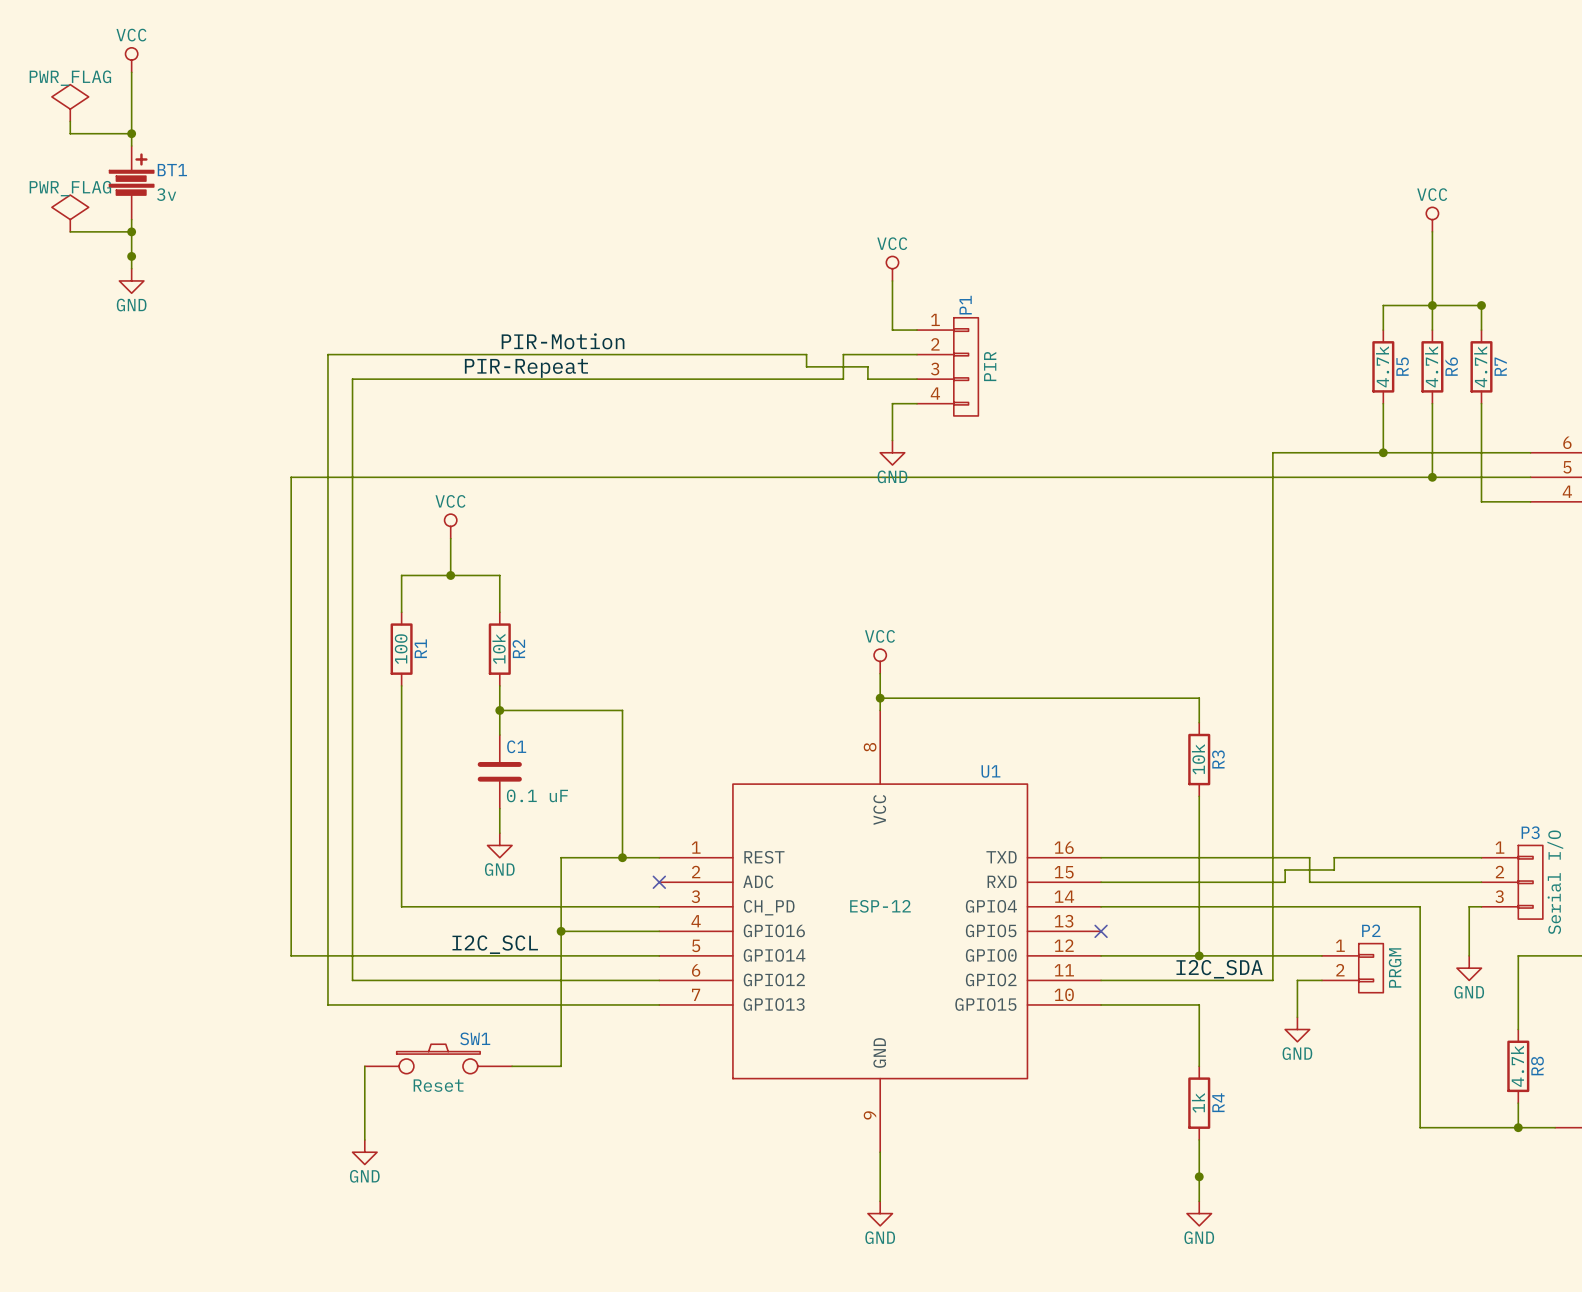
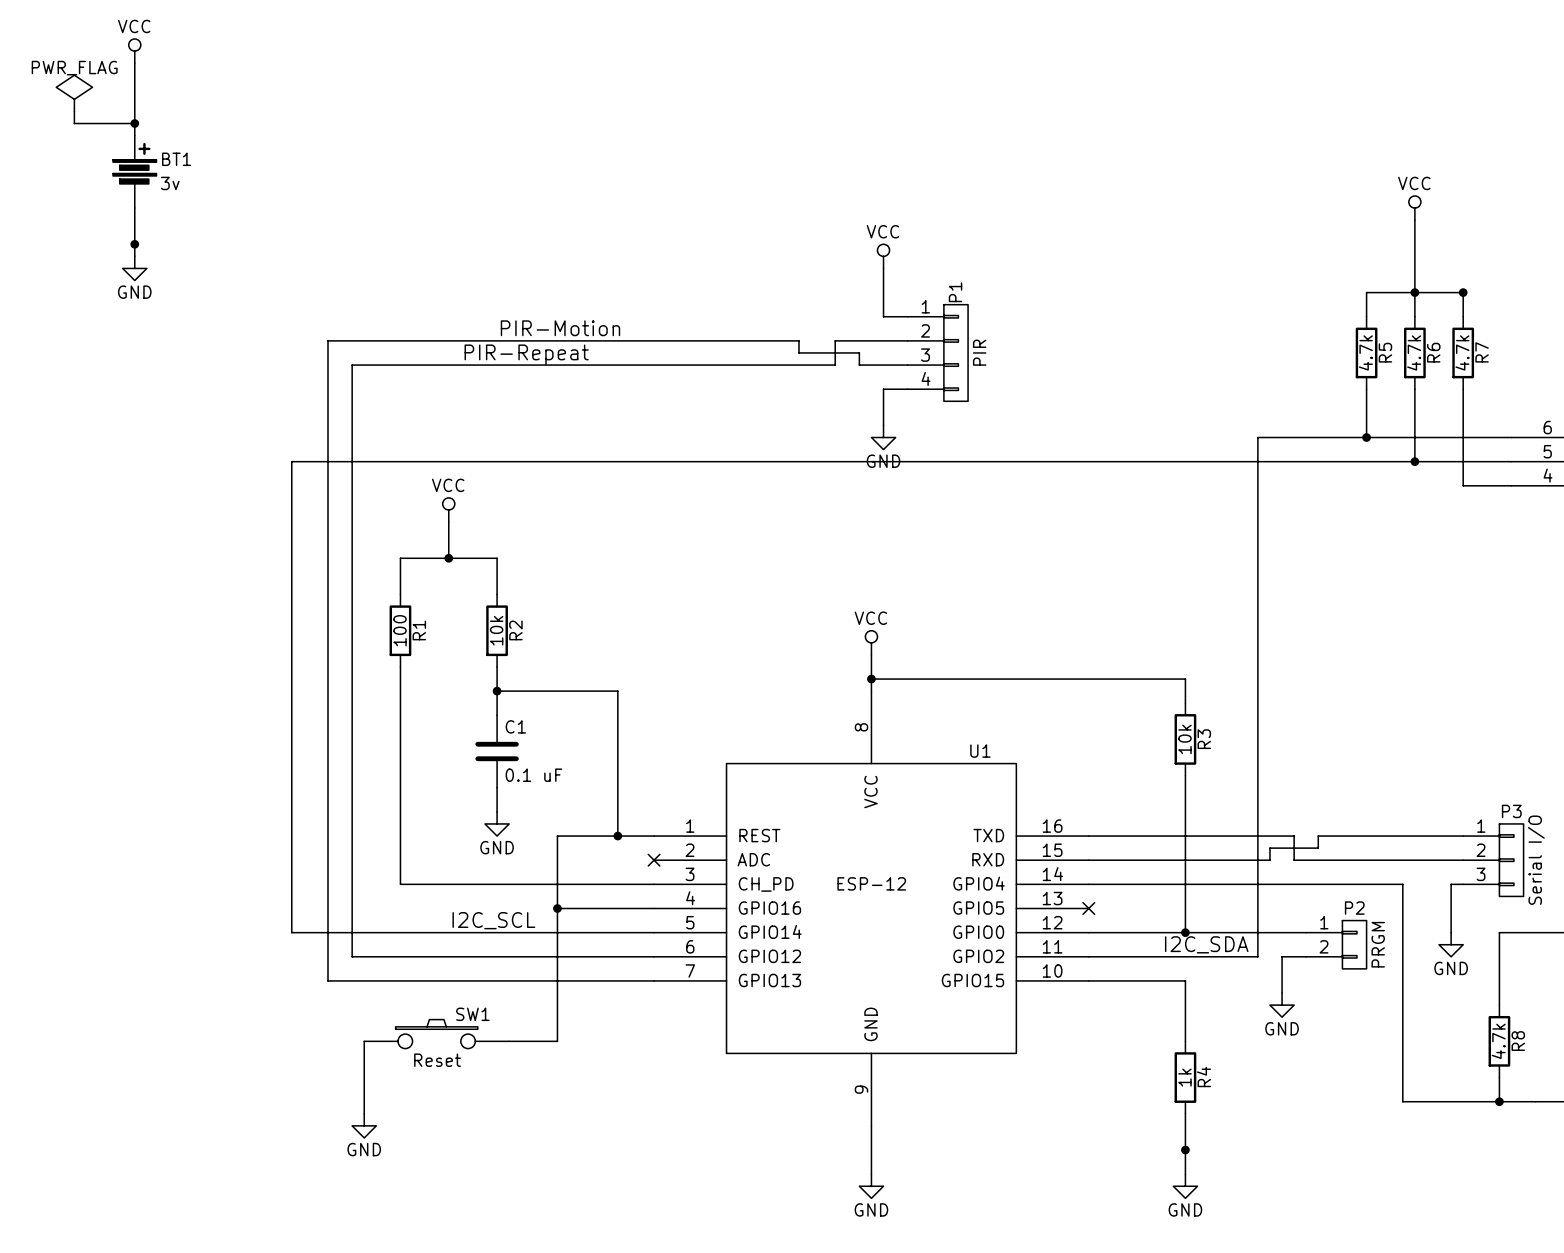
power symbol: PWR_FLAG (70, 213) -> none
wire: (70, 231) (131, 231) -> none
junction: (131, 231) -> none

